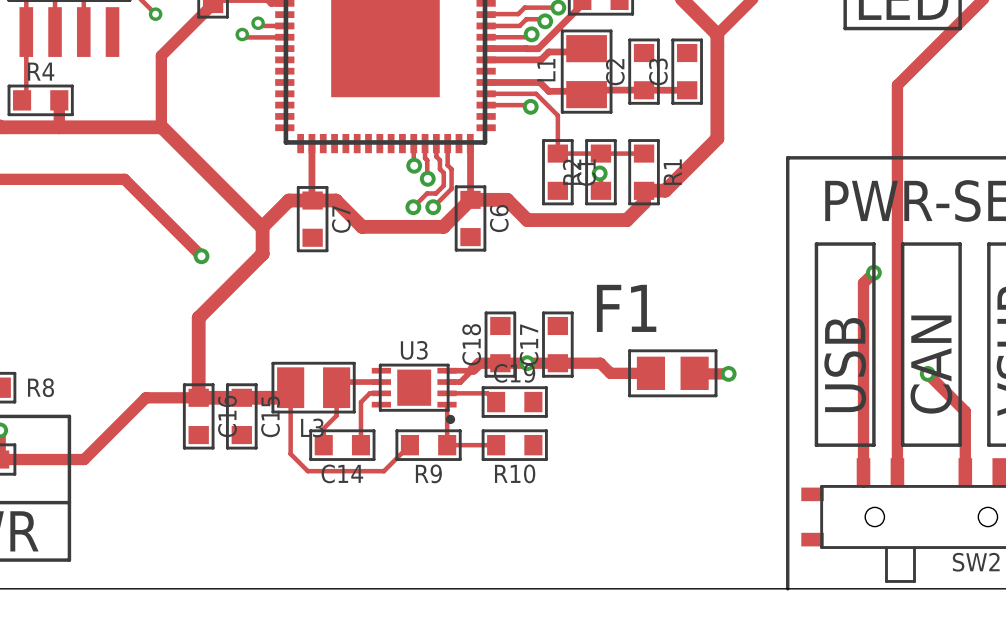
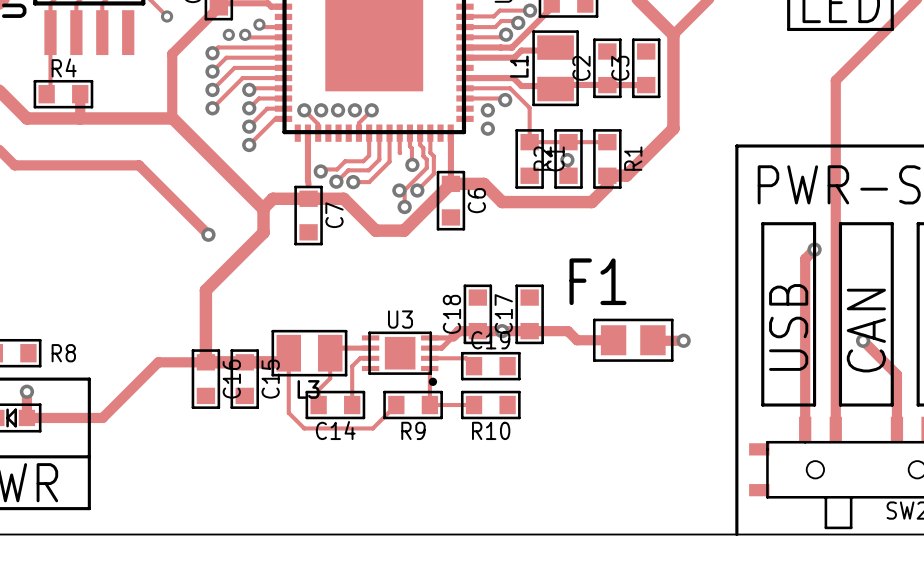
via: none -> (228, 34)
track: none -> (283, 47) (218, 47) (212, 53)
via: none -> (212, 53)
track: none -> (283, 57) (226, 57) (212, 71)
track: none -> (283, 67) (234, 67) (212, 89)
via: none -> (212, 71)
track: none -> (283, 78) (242, 78) (212, 108)
track: none -> (283, 88) (250, 88) (249, 89)
via: none -> (212, 89)
via: none -> (249, 89)
track: none -> (283, 98) (259, 98) (249, 108)
via: none -> (212, 108)
via: none -> (249, 108)
track: none -> (283, 108) (267, 108) (249, 126)
track: none -> (304, 110) (318, 124) (318, 133)
via: none -> (304, 110)
via: none -> (321, 110)
via: none -> (338, 110)
via: none -> (354, 110)
track: none -> (371, 110) (358, 123) (358, 133)
via: none -> (371, 110)
via: none -> (487, 110)
track: none -> (283, 118) (275, 118) (249, 144)
via: none -> (249, 126)
via: none -> (487, 128)
track: none -> (369, 133) (369, 155) (363, 161) (345, 161) (337, 169) (322, 169) (320, 171)
track: none -> (379, 133) (379, 159) (368, 170) (348, 170) (336, 181)
track: none -> (389, 133) (389, 161) (369, 182) (353, 182)
via: none -> (249, 144)
via: (414, 165) -> none
track: (443, 182) (443, 185) (435, 193) (427, 193) (413, 207) -> (426, 168) (404, 190) (404, 207)
via: none -> (320, 171)
via: none -> (336, 181)
via: none -> (353, 182)
track: (273, 216) (288, 200) (335, 200) (351, 216) -> (272, 198) (343, 198)
C7 position: (312, 219) -> (308, 215)
via: none -> (404, 207)
track: (362, 226) (443, 226) -> (353, 208) (375, 230) (404, 230) (426, 208)

